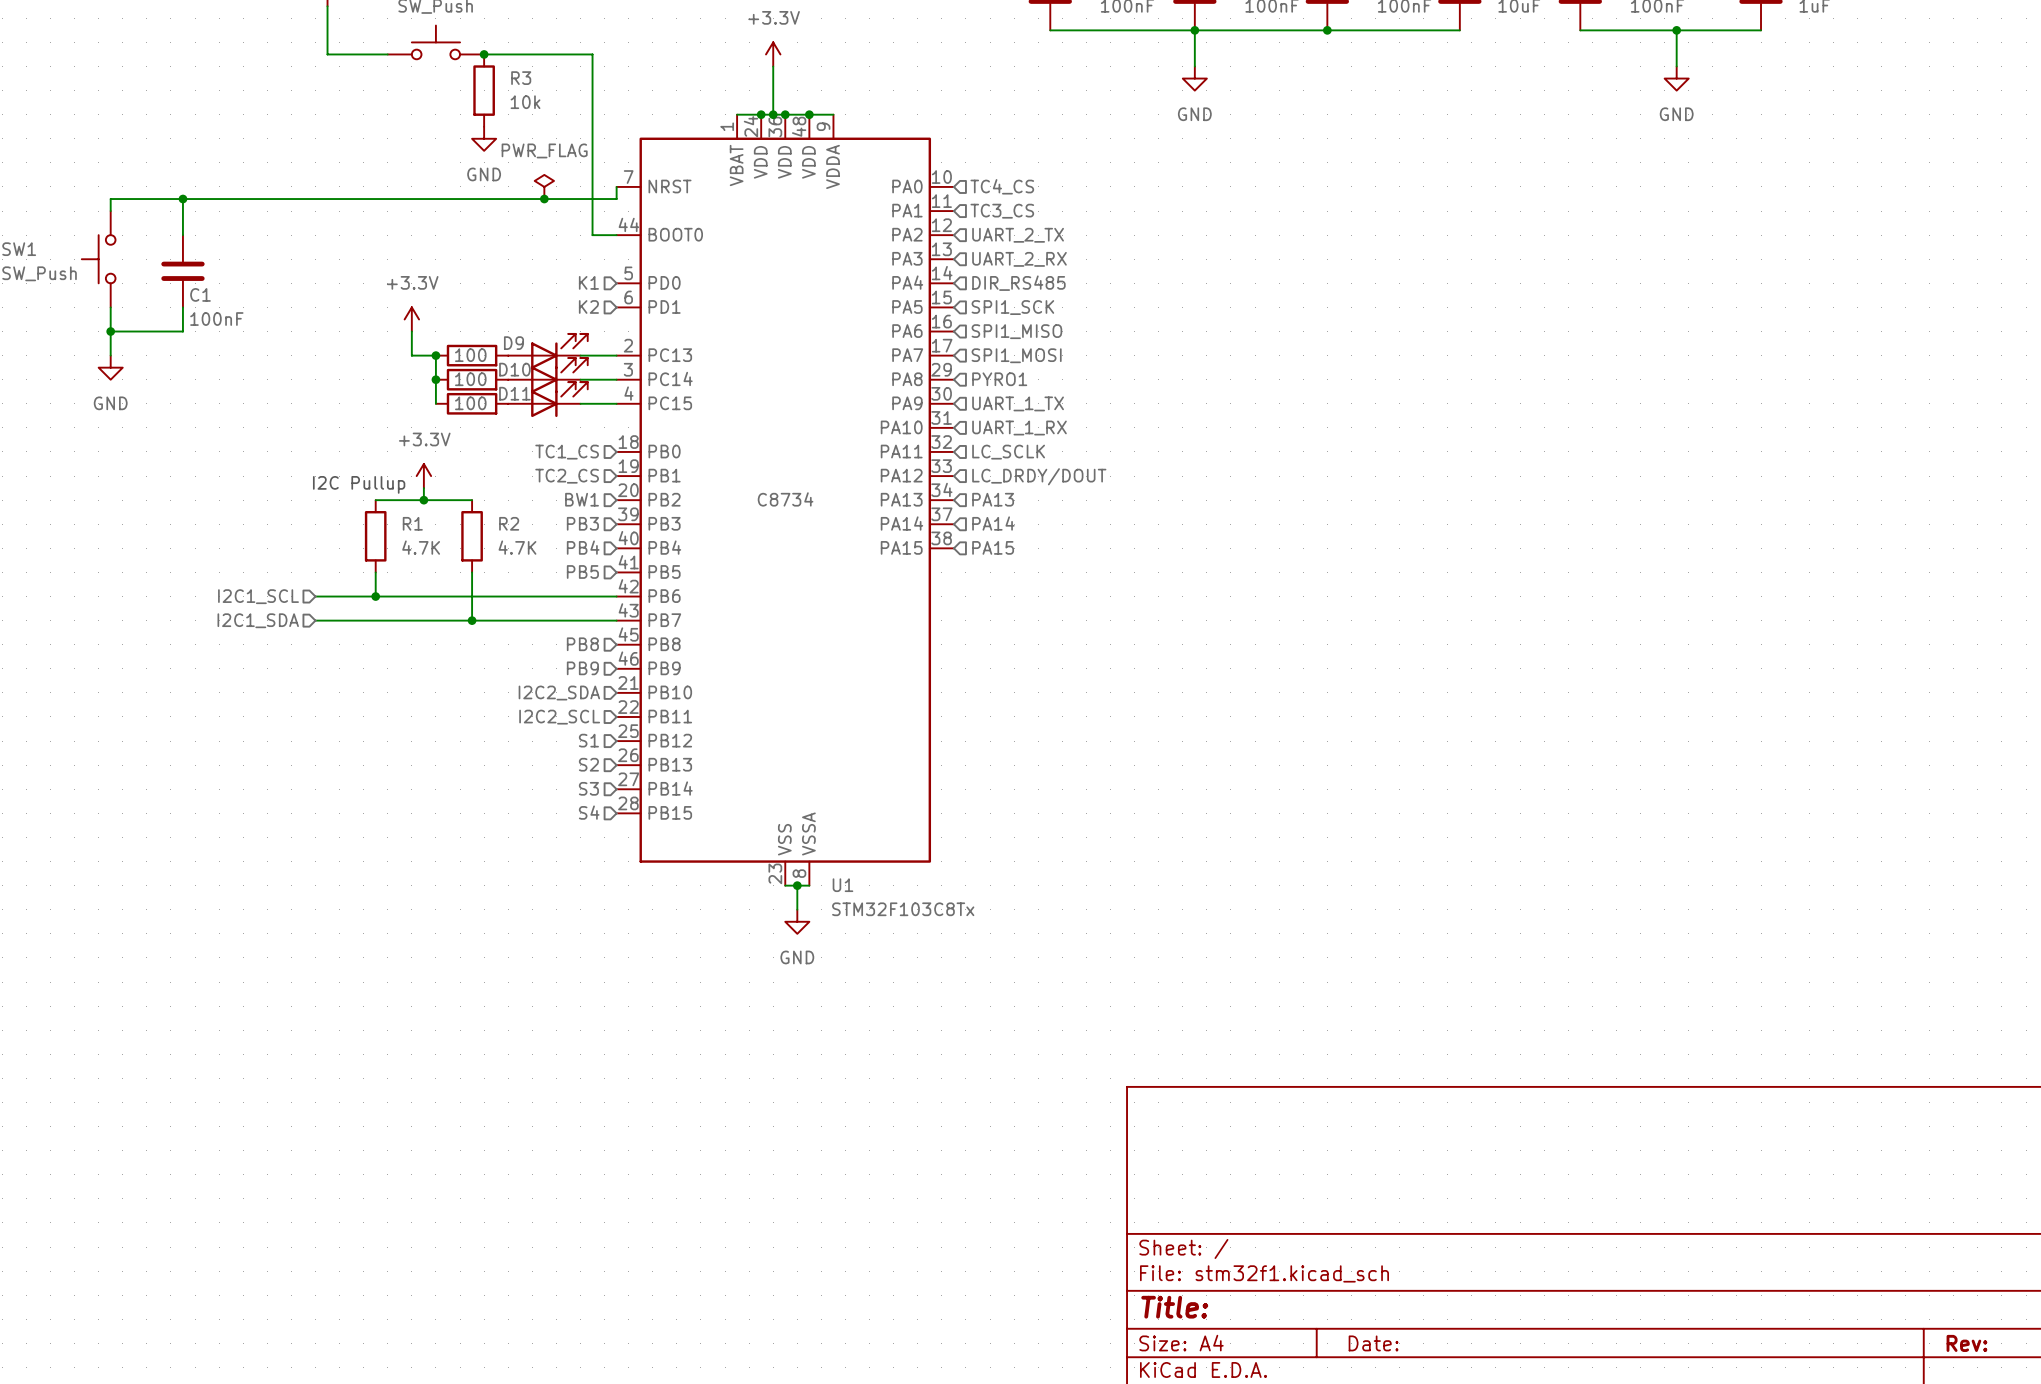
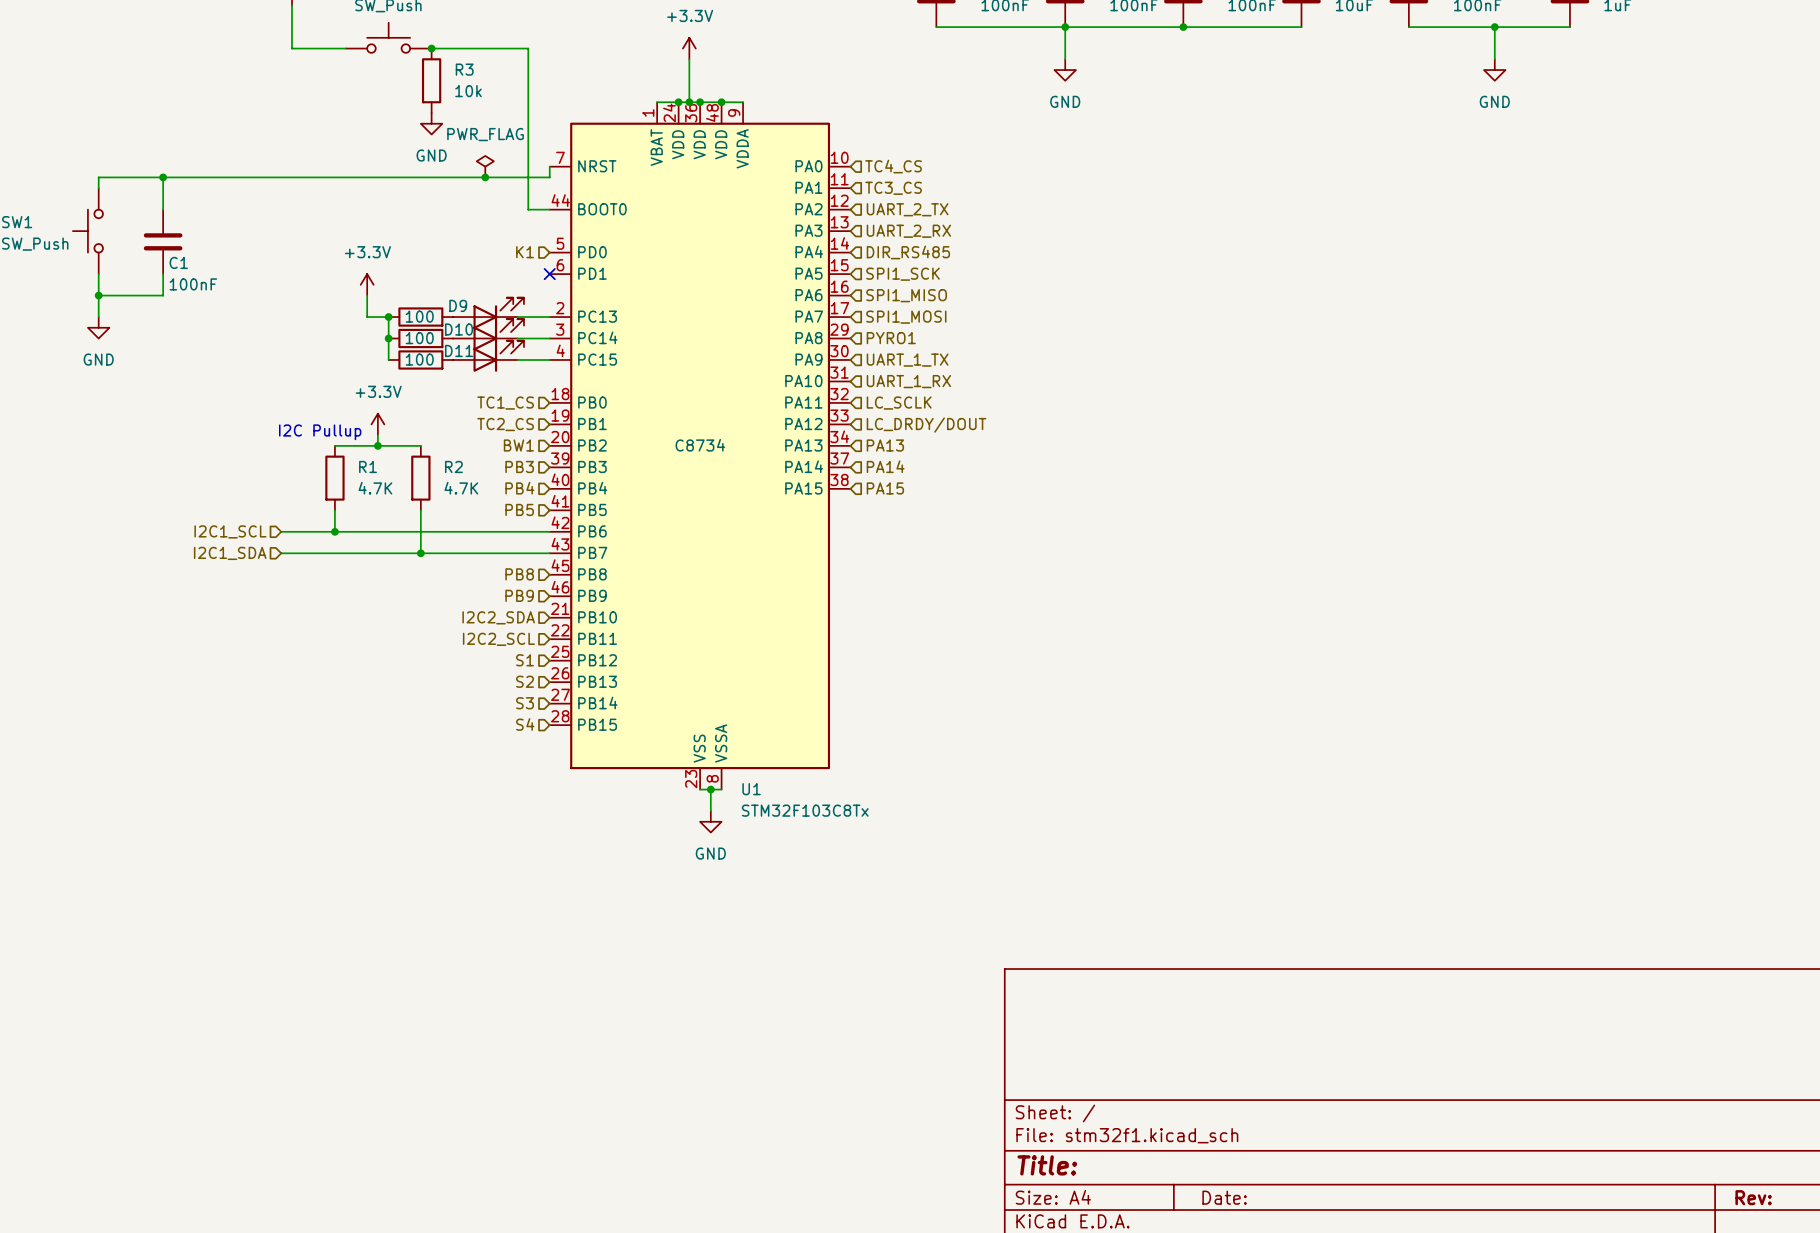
hierarchical label: K2 (588, 306) -> none
no-connect mark: none -> (549, 274)

